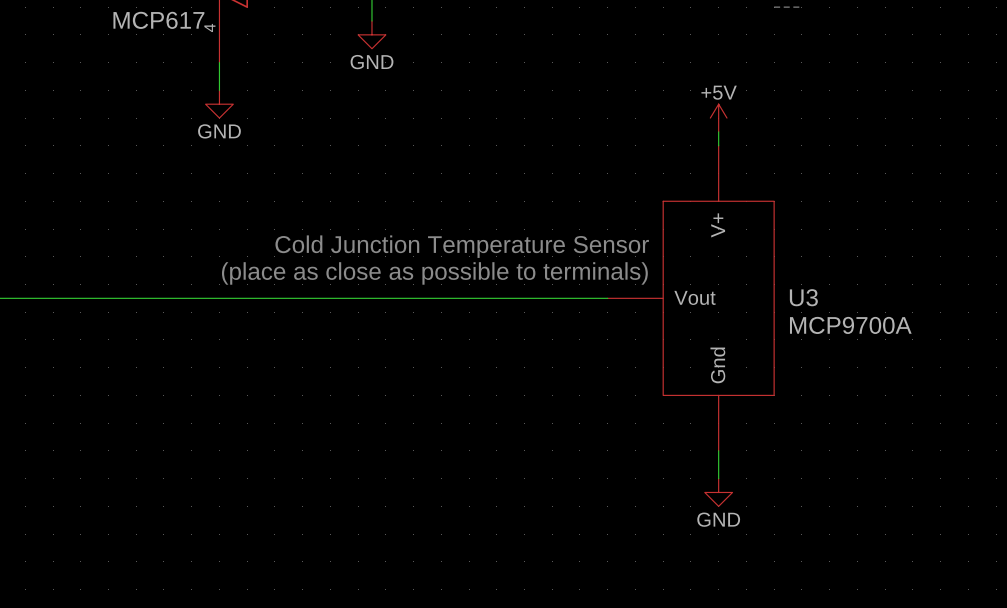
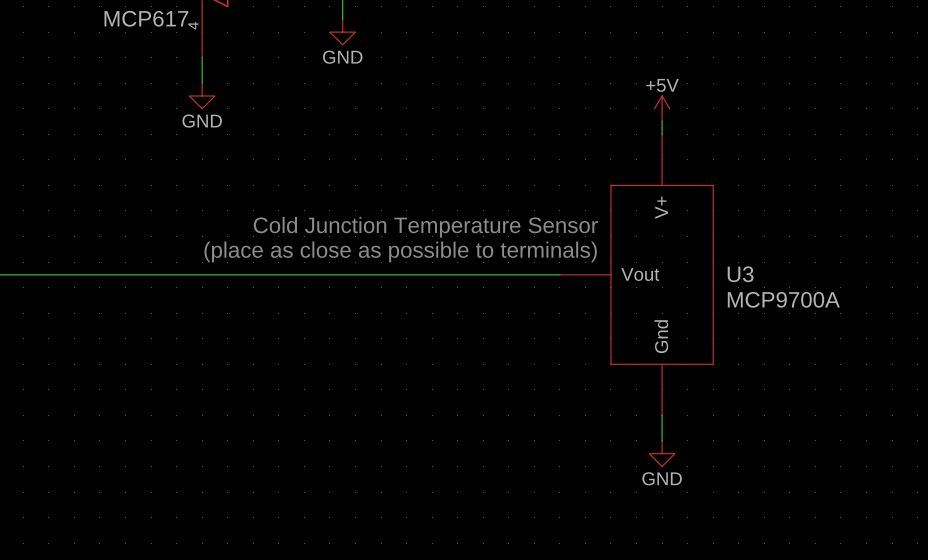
line: (774, 7) (801, 7) -> none

